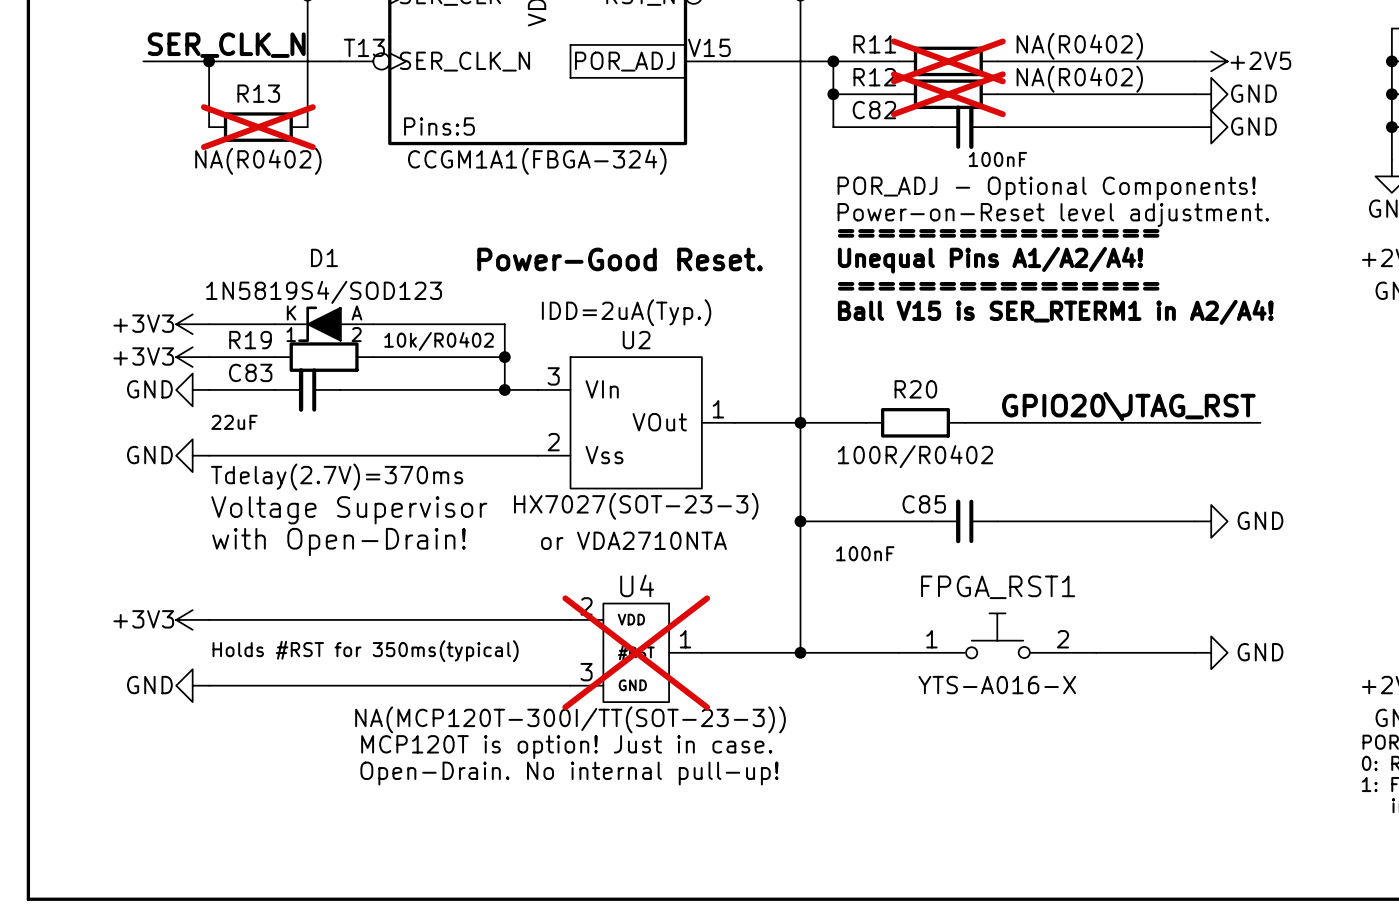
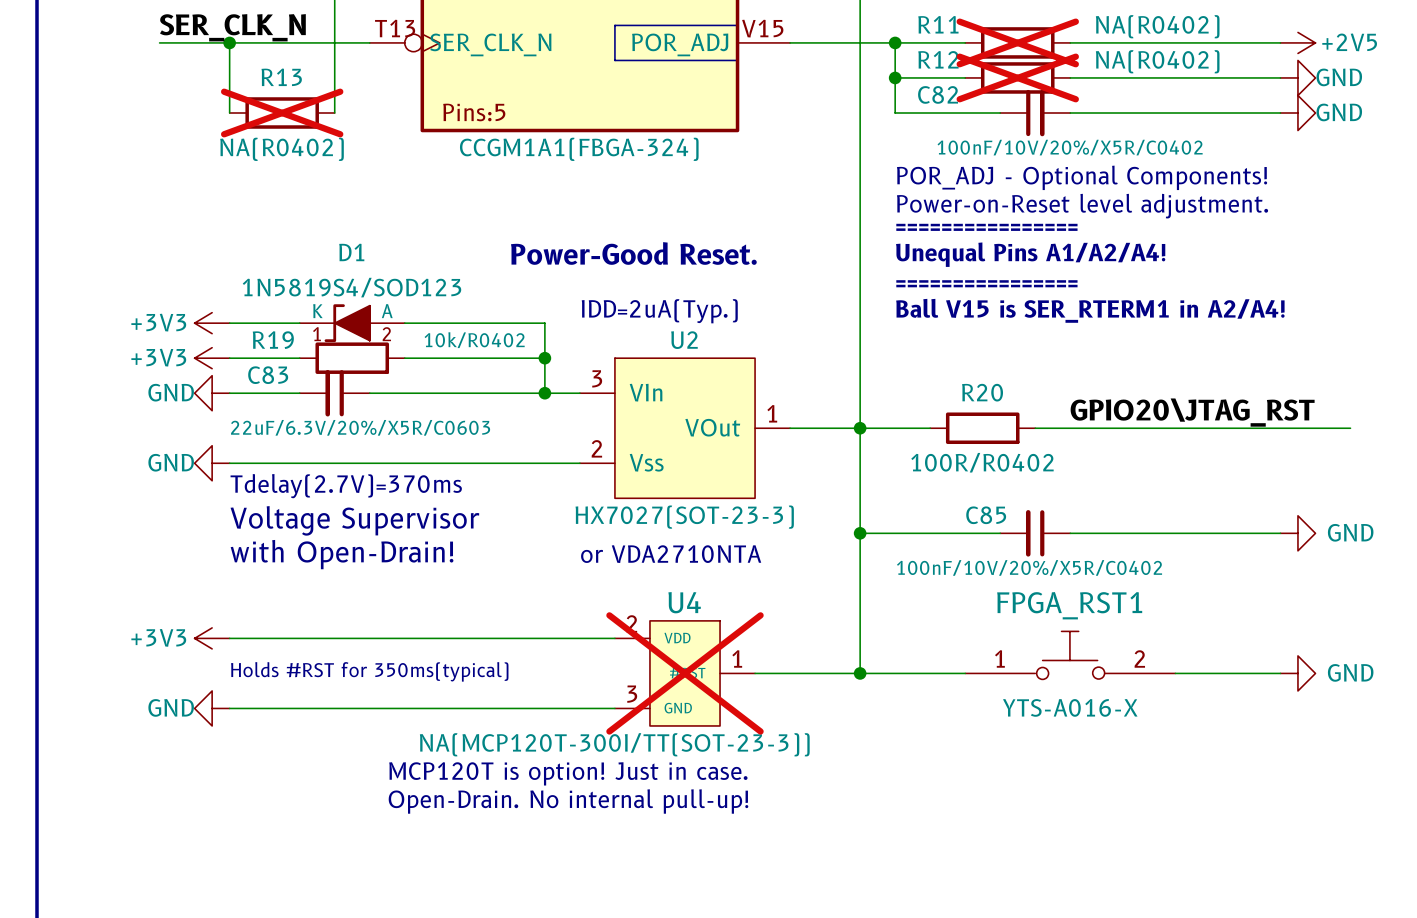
C82 value: 100nF (997, 159) -> 100nF/10V/20%/X5R/C0402 (1070, 147)
C83 value: 22uF (234, 422) -> 22uF/6.3V/20%/X5R/C0603 (360, 427)
C85 value: 100nF (865, 553) -> 100nF/10V/20%/X5R/C0402 (1029, 567)

